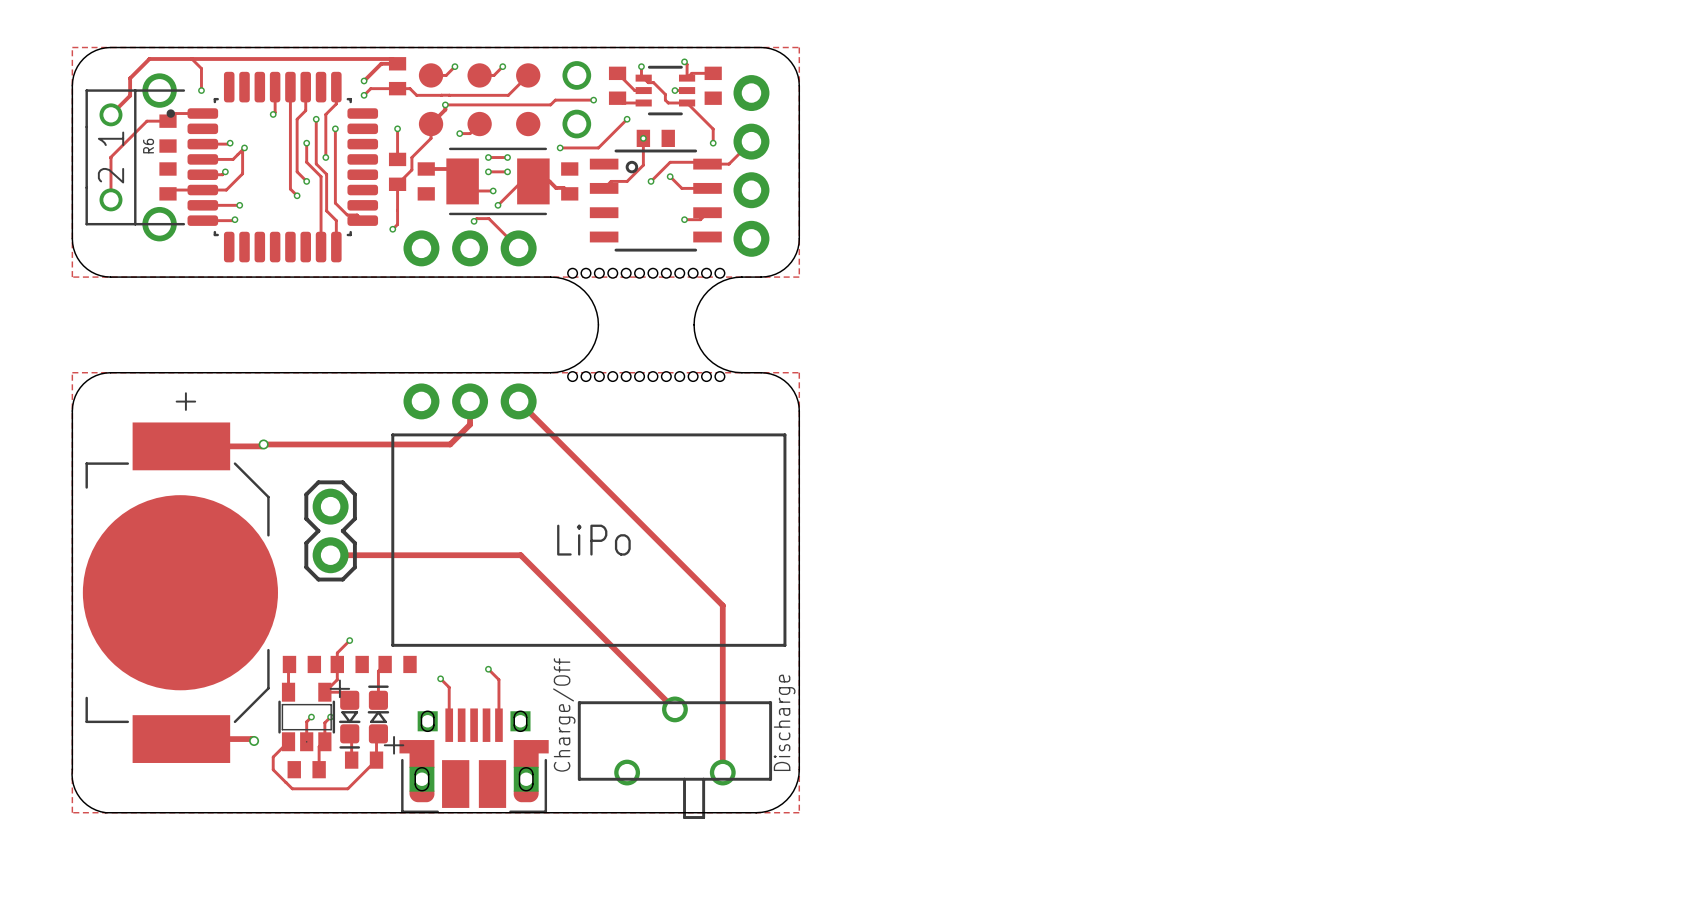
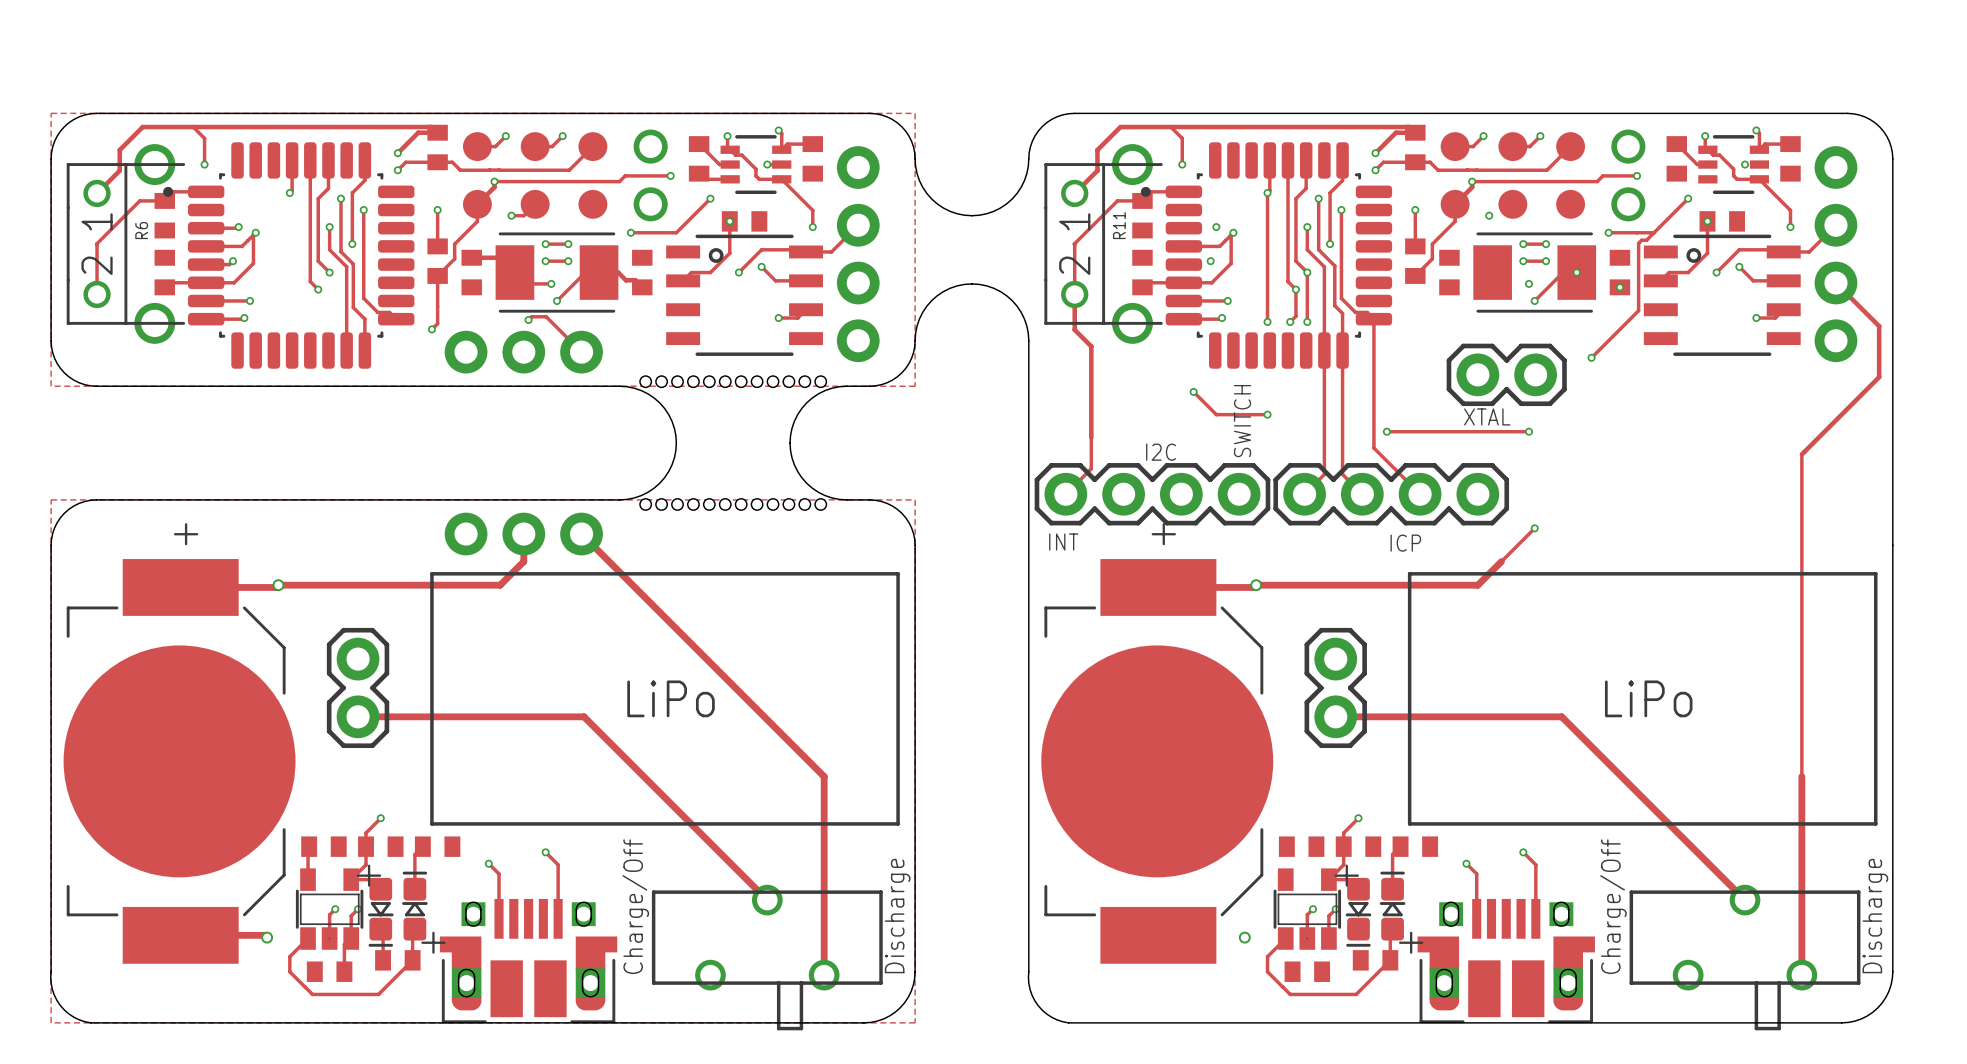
track: none -> (1170, 127) (1182, 138) (1182, 164)
track: none -> (1756, 130) (1759, 133) (1759, 149) (1765, 144) (1790, 144)
via: none -> (1756, 130)
track: none -> (1483, 136) (1473, 146) (1455, 146)
via: none -> (1483, 136)
track: none -> (1540, 136) (1529, 146) (1512, 146)
via: none -> (1540, 136)
track: none -> (1705, 136) (1705, 147) (1713, 155) (1719, 155) (1733, 169) (1733, 175) (1737, 179) (1759, 179) (1790, 210) (1790, 227)
via: none -> (1705, 136)
track: none -> (1676, 144) (1697, 164) (1707, 164)
track: none -> (1570, 146) (1546, 170) (1477, 170)
part: none -> (1415, 147)
track: none -> (1375, 153) (1396, 132) (1415, 132) (1409, 127) (1120, 127) (1097, 150) (1097, 170) (1074, 193)
via: none -> (1375, 153)
board edge: (799, 85) (799, 238) -> (915, 158) (919, 180) (931, 199) (950, 211) (971, 215) (993, 211) (1012, 199) (1024, 180) (1030, 147) (1034, 136) (1042, 126) (1051, 119) (1068, 113) (1847, 113) (1864, 116) (1875, 122) (1883, 131) (1889, 141) (1892, 158) (1892, 971) (1888, 991) (1882, 1002) (1867, 1016) (1854, 1021) (1841, 1022) (1068, 1022) (1057, 1019) (1046, 1013) (1038, 1005) (1032, 995) (1028, 977) (1028, 333) (1021, 312) (1012, 300) (993, 288) (971, 283) (950, 288) (931, 300) (919, 319) (915, 340)
part: none -> (1676, 158)
part: none -> (1790, 158)
track: none -> (1269, 160) (1269, 190) (1267, 192) (1267, 321)
track: none -> (1288, 160) (1288, 281) (1295, 289) (1295, 316) (1290, 321)
track: none -> (1306, 160) (1306, 188) (1295, 198) (1295, 261) (1307, 272) (1307, 321)
track: none -> (1342, 160) (1342, 180) (1330, 192) (1330, 244)
via: none -> (1182, 164)
part: none -> (1733, 164)
via: none -> (1745, 164)
track: none -> (1375, 170) (1383, 162) (1430, 162) (1438, 170) (1467, 170)
via: none -> (1375, 170)
track: none -> (1467, 170) (1476, 170)
part: none -> (1543, 175)
track: none -> (1637, 175) (1602, 175) (1597, 181) (1472, 181) (1472, 187) (1455, 204) (1455, 221) (1432, 244) (1432, 258) (1415, 275)
via: none -> (1637, 175)
via: none -> (1472, 181)
track: none -> (1183, 191) (1151, 191) (1142, 200) (1117, 200) (1074, 244) (1074, 329) (1091, 346) (1091, 468) (1065, 494)
via: none -> (1267, 192)
track: none -> (1318, 198) (1318, 249) (1334, 265) (1334, 305) (1342, 313) (1342, 474) (1362, 494)
via: none -> (1318, 198)
track: none -> (1688, 198) (1646, 240) (1641, 240) (1638, 243) (1638, 310) (1591, 357)
via: none -> (1688, 198)
track: none -> (1341, 210) (1341, 298) (1355, 312) (1367, 312) (1373, 319) (1373, 448) (1420, 494)
via: none -> (1341, 210)
track: none -> (1415, 210) (1415, 246)
via: none -> (1415, 210)
R11: none -> (1142, 215)
via: none -> (1489, 215)
track: none -> (1707, 221) (1707, 253) (1688, 272) (1669, 272) (1660, 280)
via: none -> (1707, 221)
part: none -> (1722, 221)
track: none -> (1835, 225) (1809, 251) (1739, 249) (1716, 272)
via: none -> (1216, 227)
track: none -> (1307, 227) (1307, 249) (1324, 266) (1324, 474) (1304, 494)
via: none -> (1307, 227)
via: none -> (1790, 227)
track: none -> (1233, 232) (1219, 246) (1183, 246)
via: none -> (1233, 232)
track: none -> (1608, 232) (1654, 232)
via: none -> (1608, 232)
track: none -> (1231, 235) (1231, 263) (1211, 282) (1147, 282) (1142, 287)
part: none -> (1103, 243)
via: none -> (1330, 244)
track: none -> (1523, 244) (1546, 244)
via: none -> (1523, 244)
via: none -> (1546, 244)
part: none -> (1835, 254)
part: none -> (1266, 255)
via: none -> (1210, 261)
part: none -> (1415, 261)
track: none -> (1523, 261) (1546, 261)
via: none -> (1523, 261)
via: none -> (1546, 261)
track: none -> (1739, 266) (1753, 280) (1783, 280)
via: none -> (1739, 266)
part: none -> (1142, 272)
via: none -> (1307, 272)
part: none -> (1449, 272)
part: none -> (1534, 272)
track: none -> (1576, 272) (1563, 272) (1534, 300)
via: none -> (1576, 272)
part: none -> (1619, 272)
via: none -> (1716, 272)
via: none -> (1529, 283)
track: none -> (1835, 283) (1879, 326) (1879, 377) (1801, 454)
via: none -> (1619, 287)
via: none -> (1295, 289)
part: none -> (1722, 295)
track: none -> (1183, 300) (1227, 300)
via: none -> (1227, 300)
via: none -> (1534, 300)
track: none -> (1783, 309) (1775, 318) (1756, 318)
track: none -> (1222, 318) (1183, 319)
via: none -> (1222, 318)
via: none -> (1756, 318)
via: none -> (1267, 321)
via: none -> (1290, 321)
via: none -> (1307, 321)
via: none -> (1591, 357)
part: none -> (1506, 374)
track: none -> (1193, 391) (1216, 414) (1267, 414)
via: none -> (1193, 391)
via: none -> (1267, 414)
text: none -> XTAL (1487, 416)
text: none -> SWITCH (1242, 421)
track: none -> (1386, 431) (1529, 431)
via: none -> (1386, 431)
via: none -> (1529, 431)
text: none -> I2C (1161, 452)
track: none -> (1801, 454) (1801, 975)
part: none -> (1152, 494)
part: none -> (1391, 494)
track: none -> (1534, 528) (1477, 585) (1256, 585) (1253, 587) (1158, 587)
via: none -> (1534, 528)
text: none -> INT (1063, 541)
text: none -> ICP (1405, 543)
line: none -> (1409, 573) (1875, 573) (1875, 823) (1409, 823) (1409, 573)
via: none -> (1256, 585)
part: none -> (1335, 687)
text: none -> LiPo (1648, 698)
track: none -> (1335, 716) (1561, 716) (1745, 900)
part: none -> (1157, 761)
track: none -> (1358, 818) (1343, 833) (1343, 864) (1328, 879) (1348, 879) (1358, 889)
via: none -> (1358, 818)
part: none -> (1301, 846)
part: none -> (1358, 846)
track: none -> (1400, 846) (1392, 854) (1392, 889)
part: none -> (1415, 846)
track: none -> (1523, 852) (1535, 864) (1535, 918)
via: none -> (1523, 852)
track: none -> (1466, 863) (1476, 873) (1476, 918)
via: none -> (1466, 863)
part: none -> (1392, 906)
text: none -> Charge/Off (1613, 906)
part: none -> (1307, 909)
track: none -> (1313, 909) (1307, 914) (1307, 938)
via: none -> (1313, 909)
track: none -> (1335, 909) (1328, 916) (1328, 938)
via: none -> (1335, 909)
part: none -> (1358, 912)
text: none -> Discharge (1875, 916)
track: none -> (1392, 929) (1390, 931) (1390, 960) (1356, 994) (1290, 994) (1267, 971) (1267, 956) (1285, 938)
via: none -> (1244, 937)
part: none -> (1745, 957)
part: none -> (1375, 960)
part: none -> (1506, 961)
part: none -> (1307, 971)

